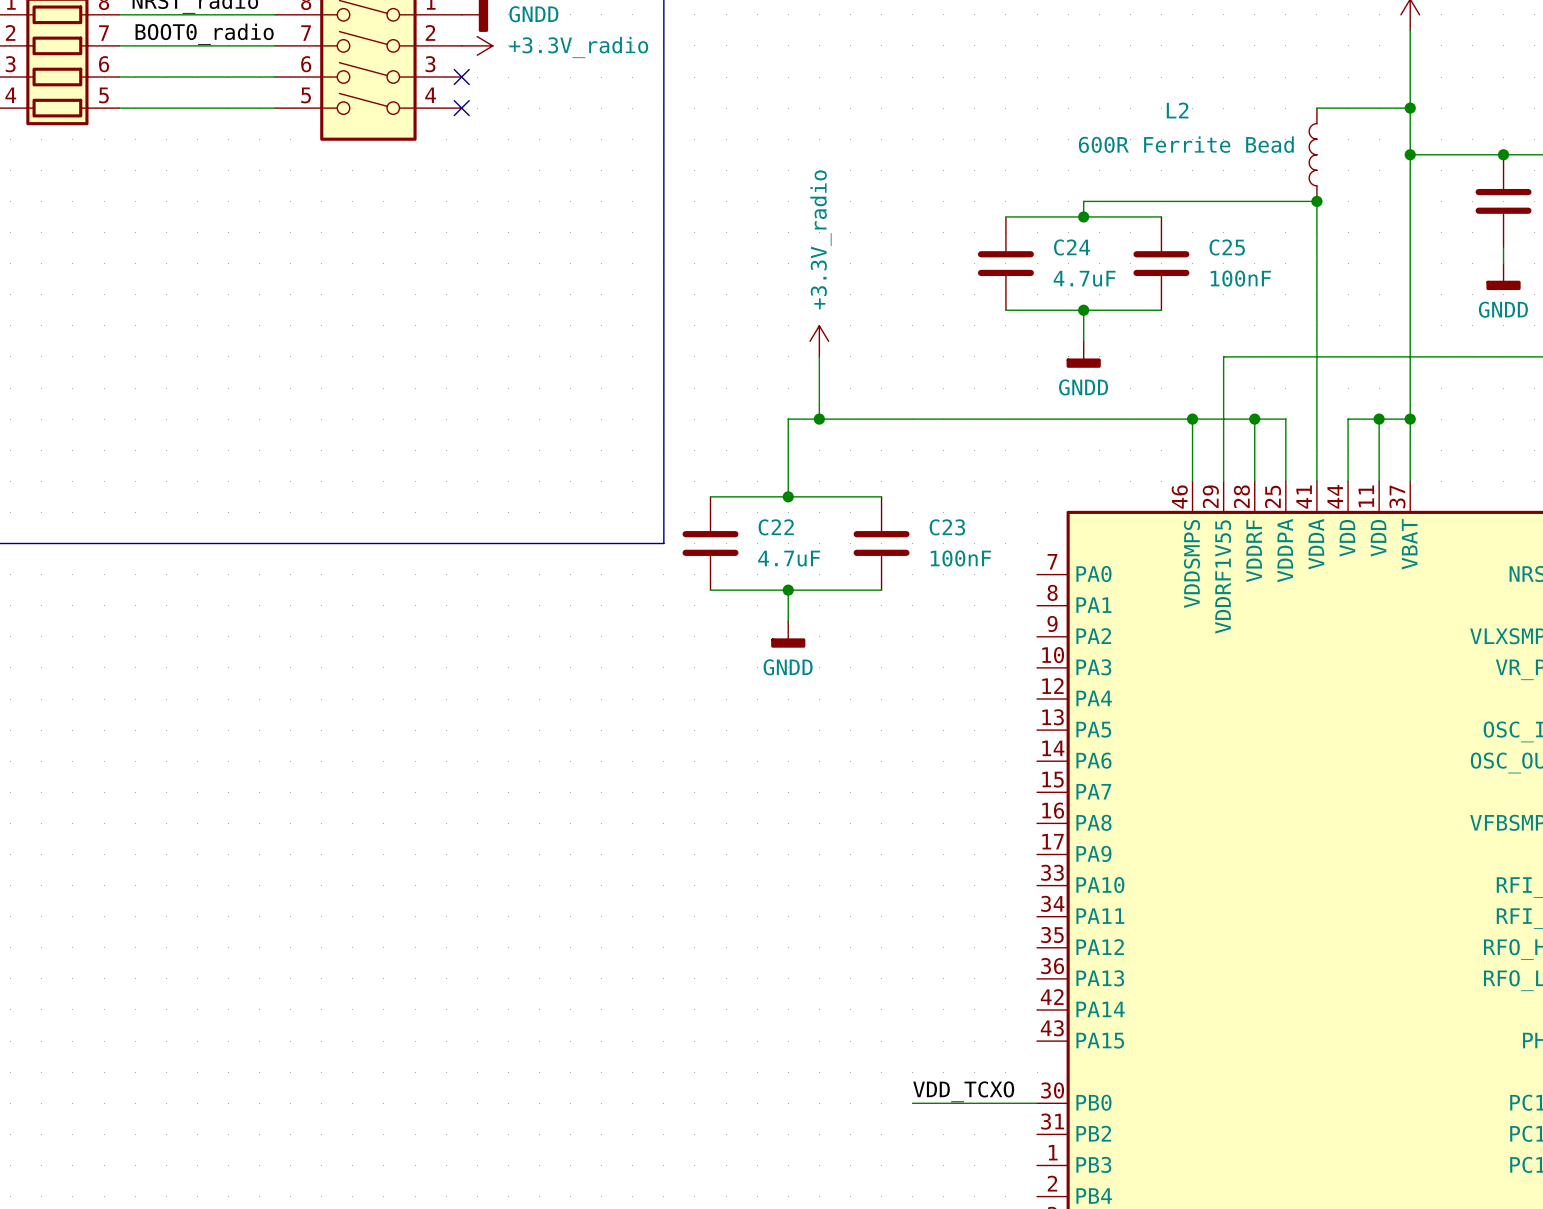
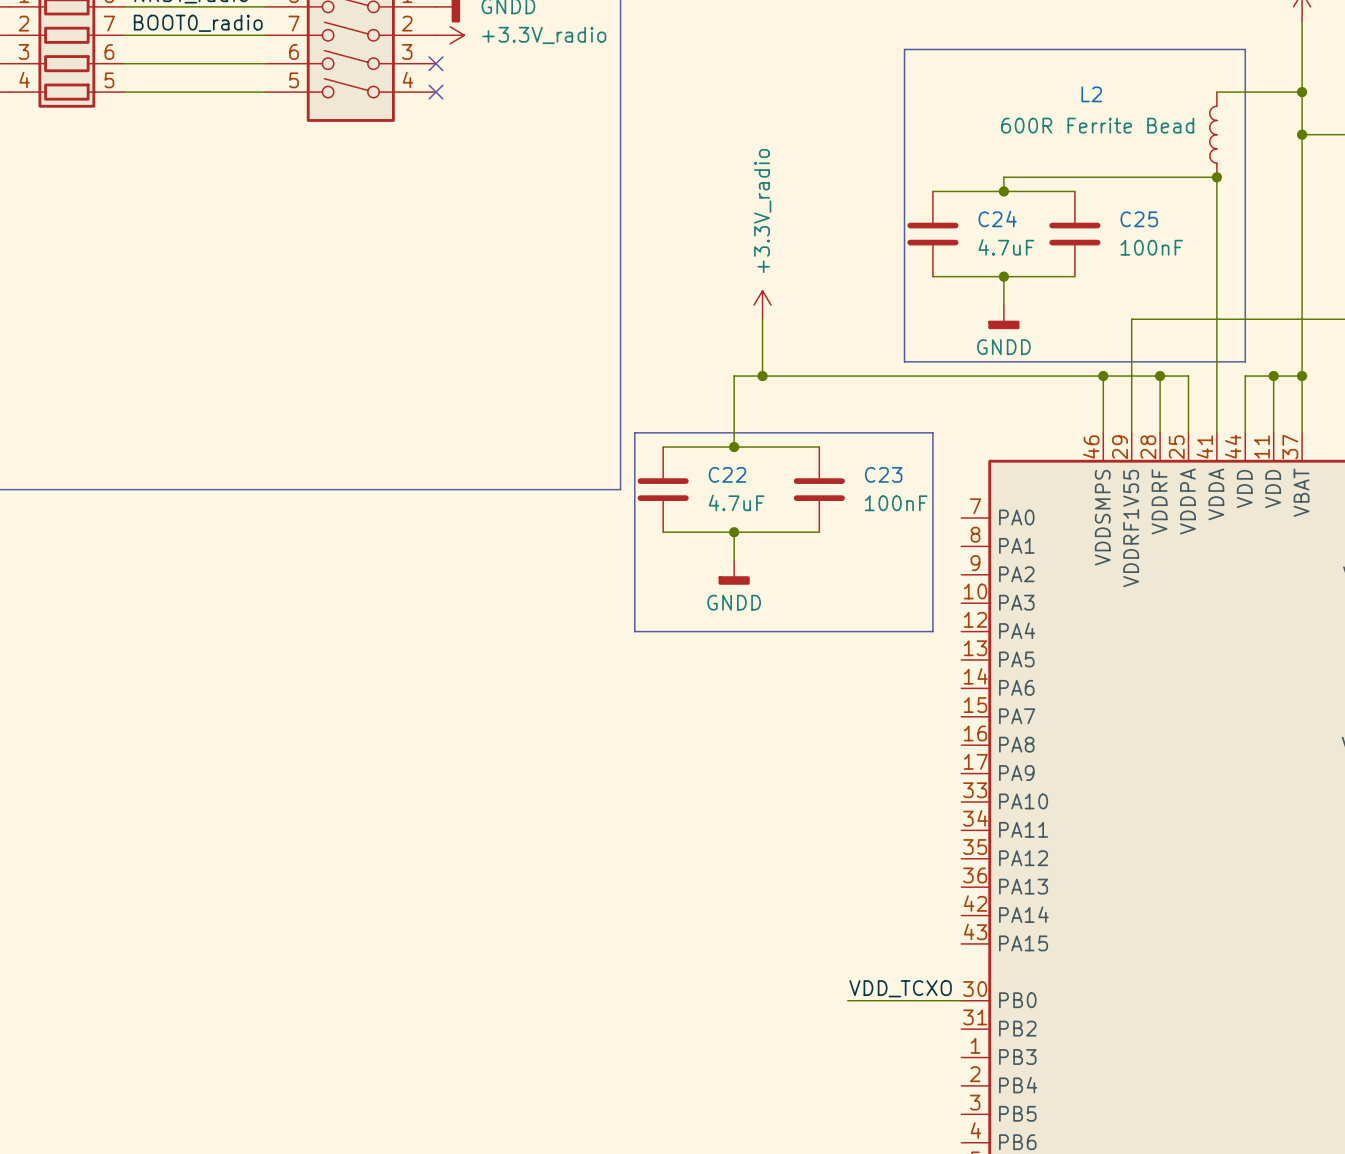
line: none -> (904, 49) (1245, 49) (1245, 361) (904, 361) (904, 49)
line: none -> (634, 432) (932, 432) (932, 631) (634, 631) (634, 432)

